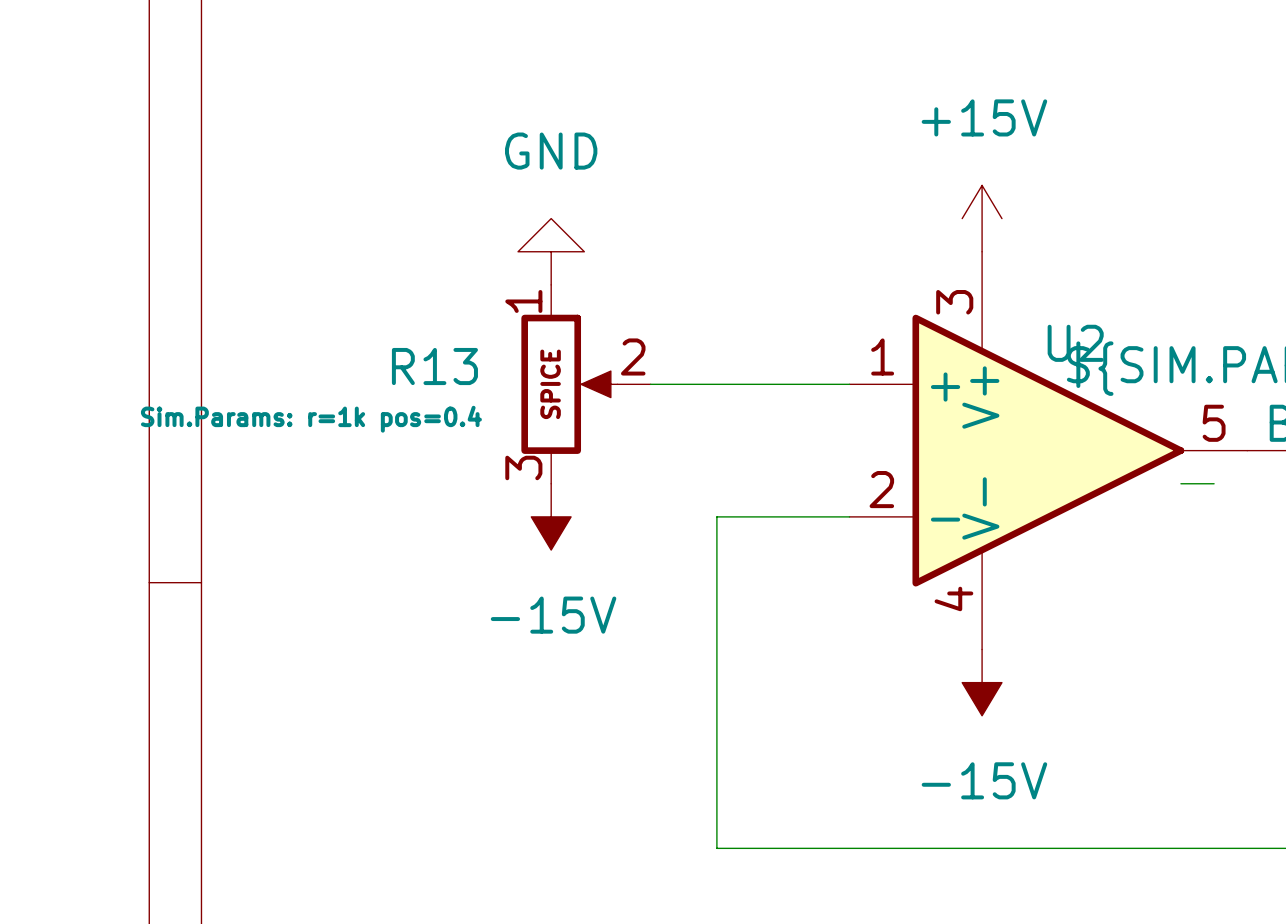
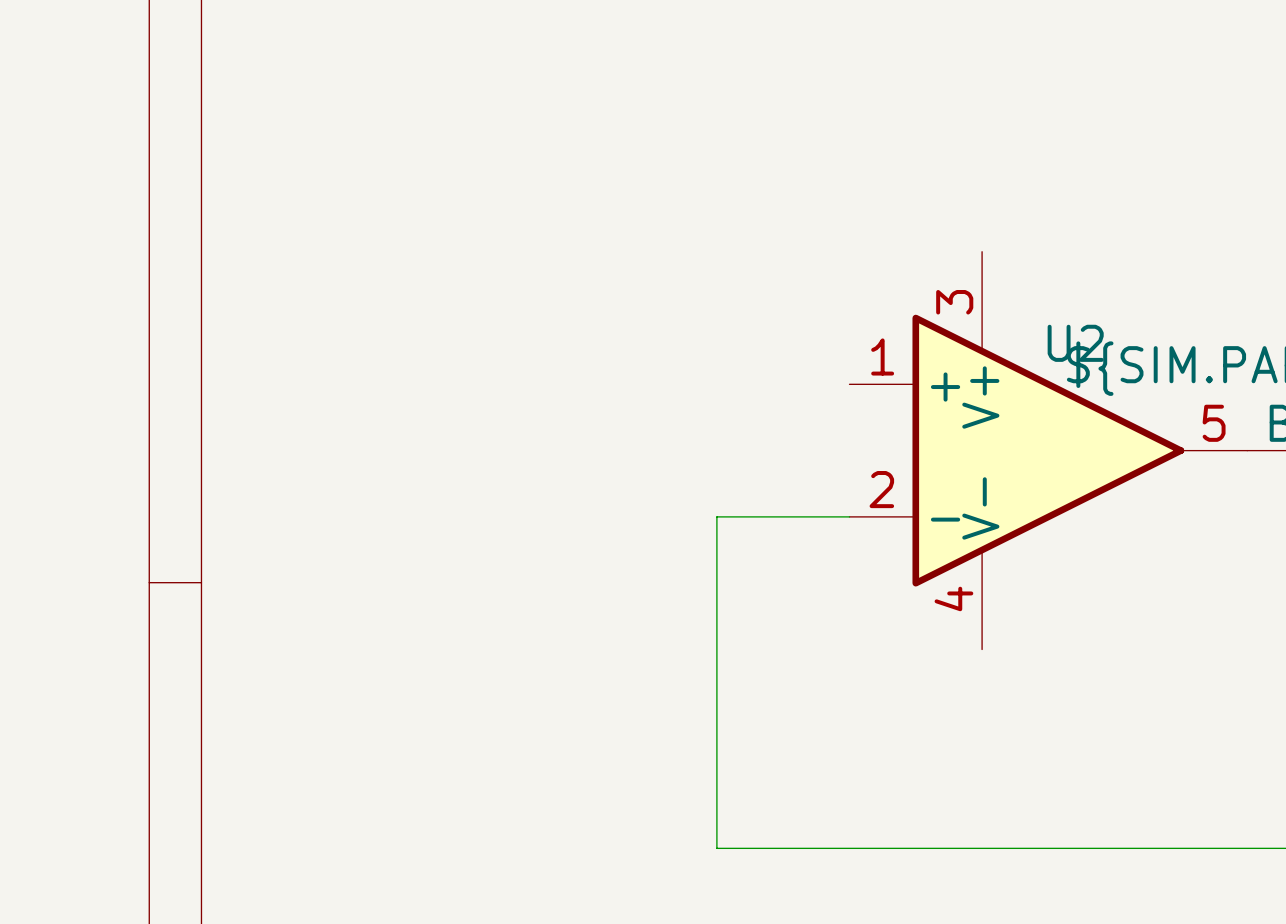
power symbol: +15V (982, 218) -> none
power symbol: GND (551, 251) -> none
R13: (585, 384) -> none
wire: (650, 384) (849, 384) -> none
wire: (1180, 483) (1214, 483) -> none
power symbol: -15V (551, 516) -> none
power symbol: -15V (982, 682) -> none

